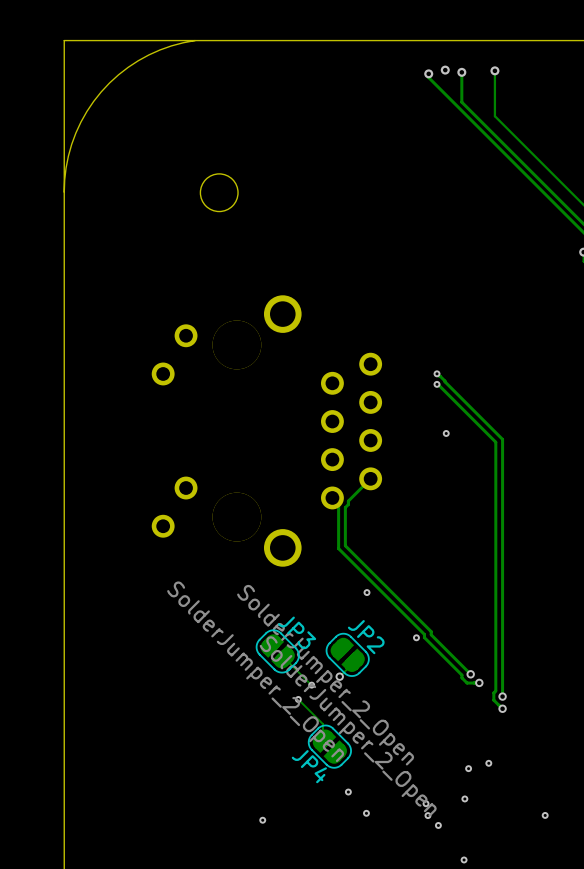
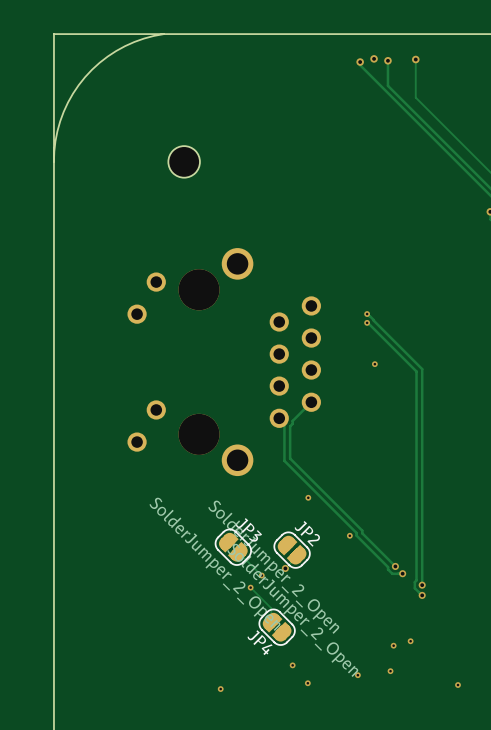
via: (427, 815) -> none
via: (438, 825) -> none
via: (464, 859) -> none

